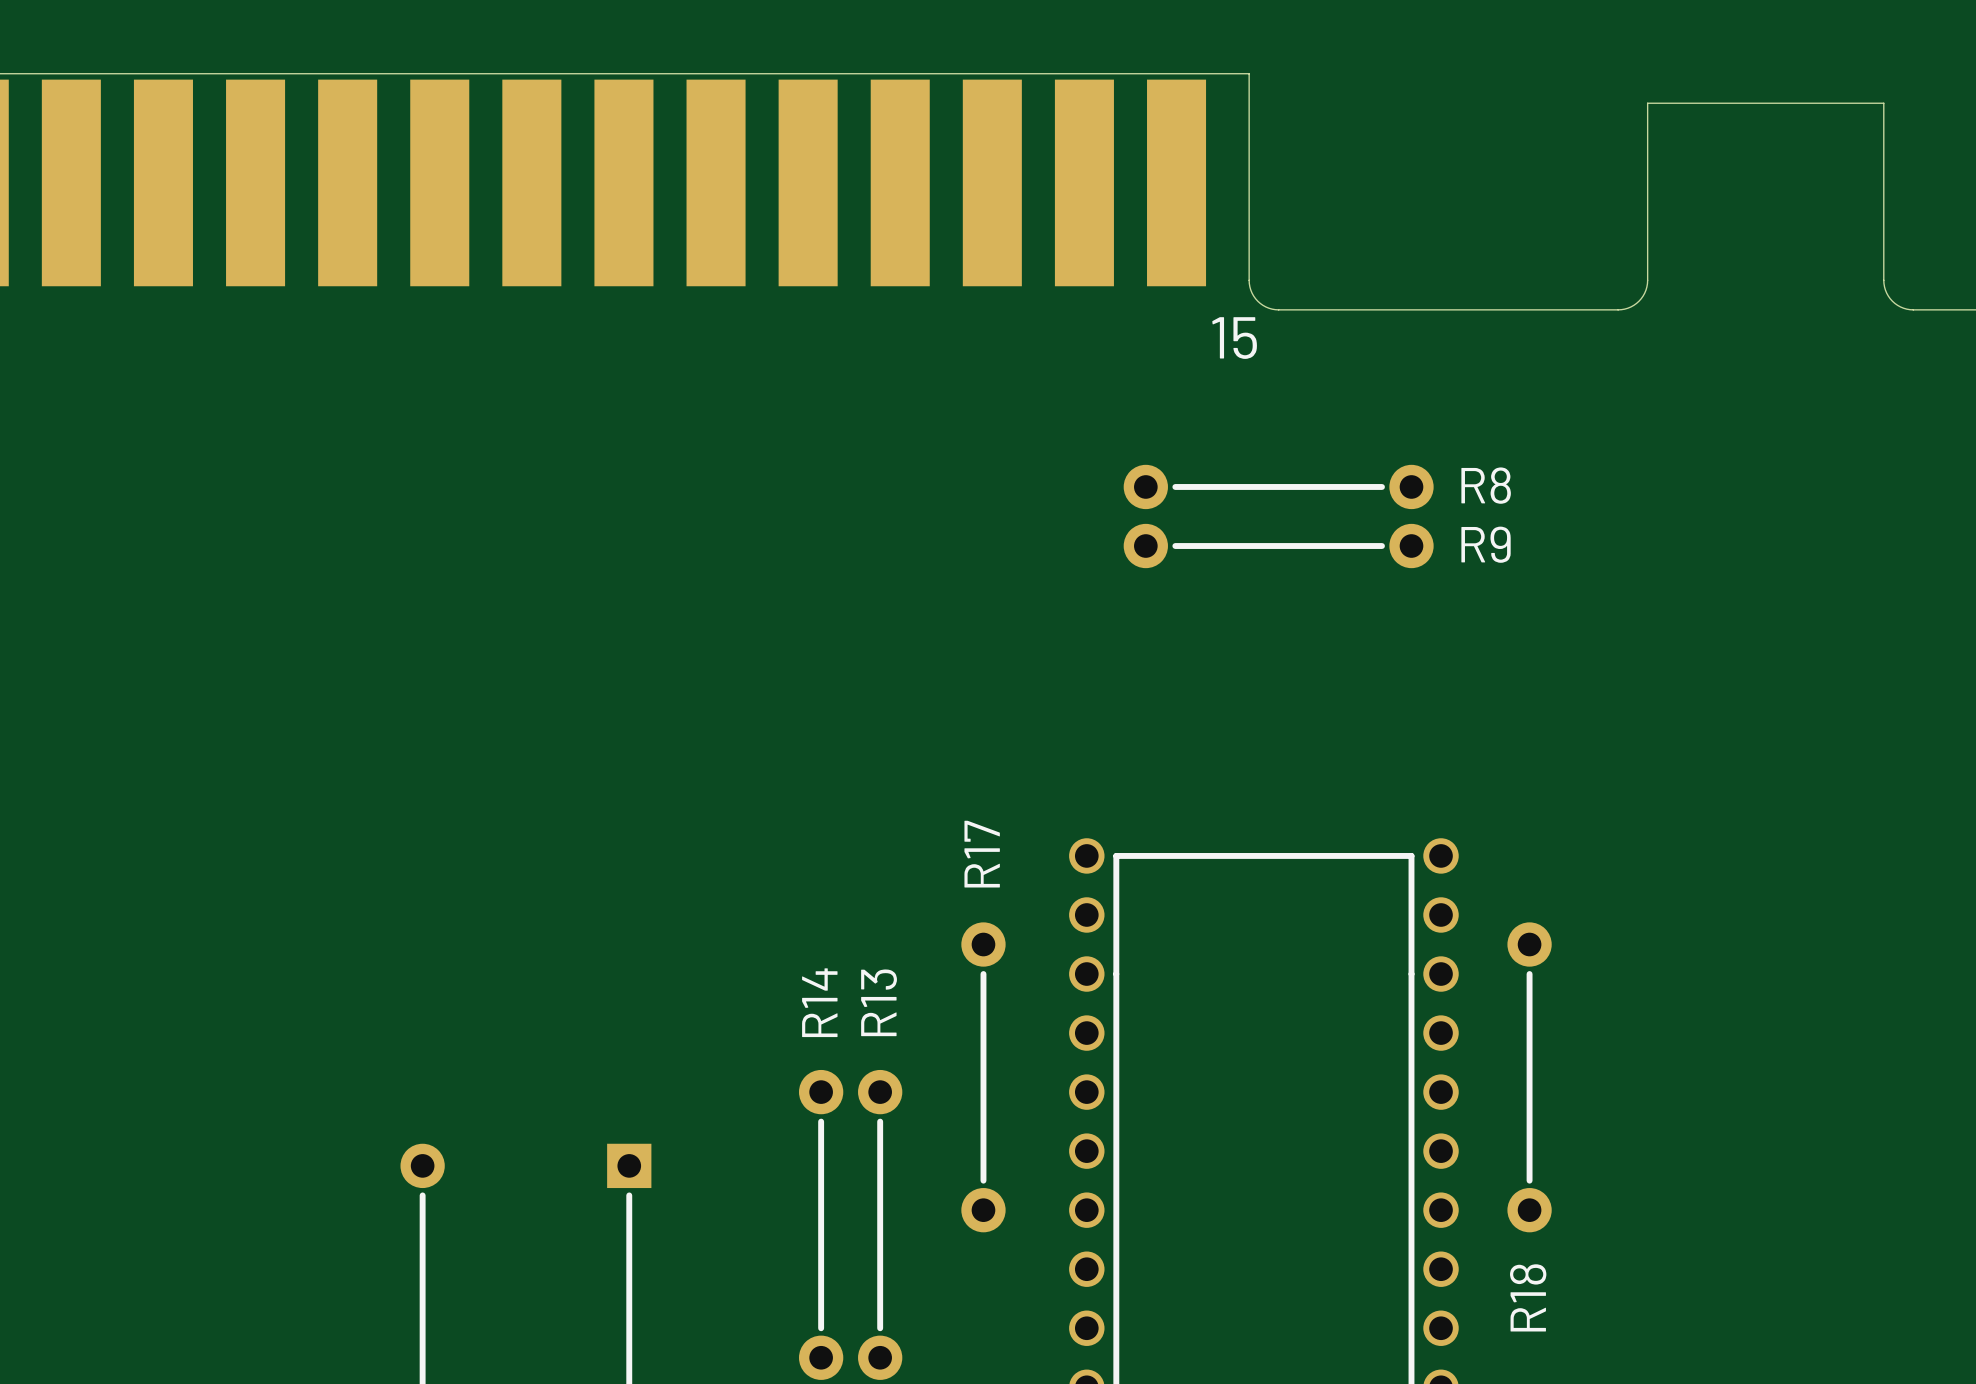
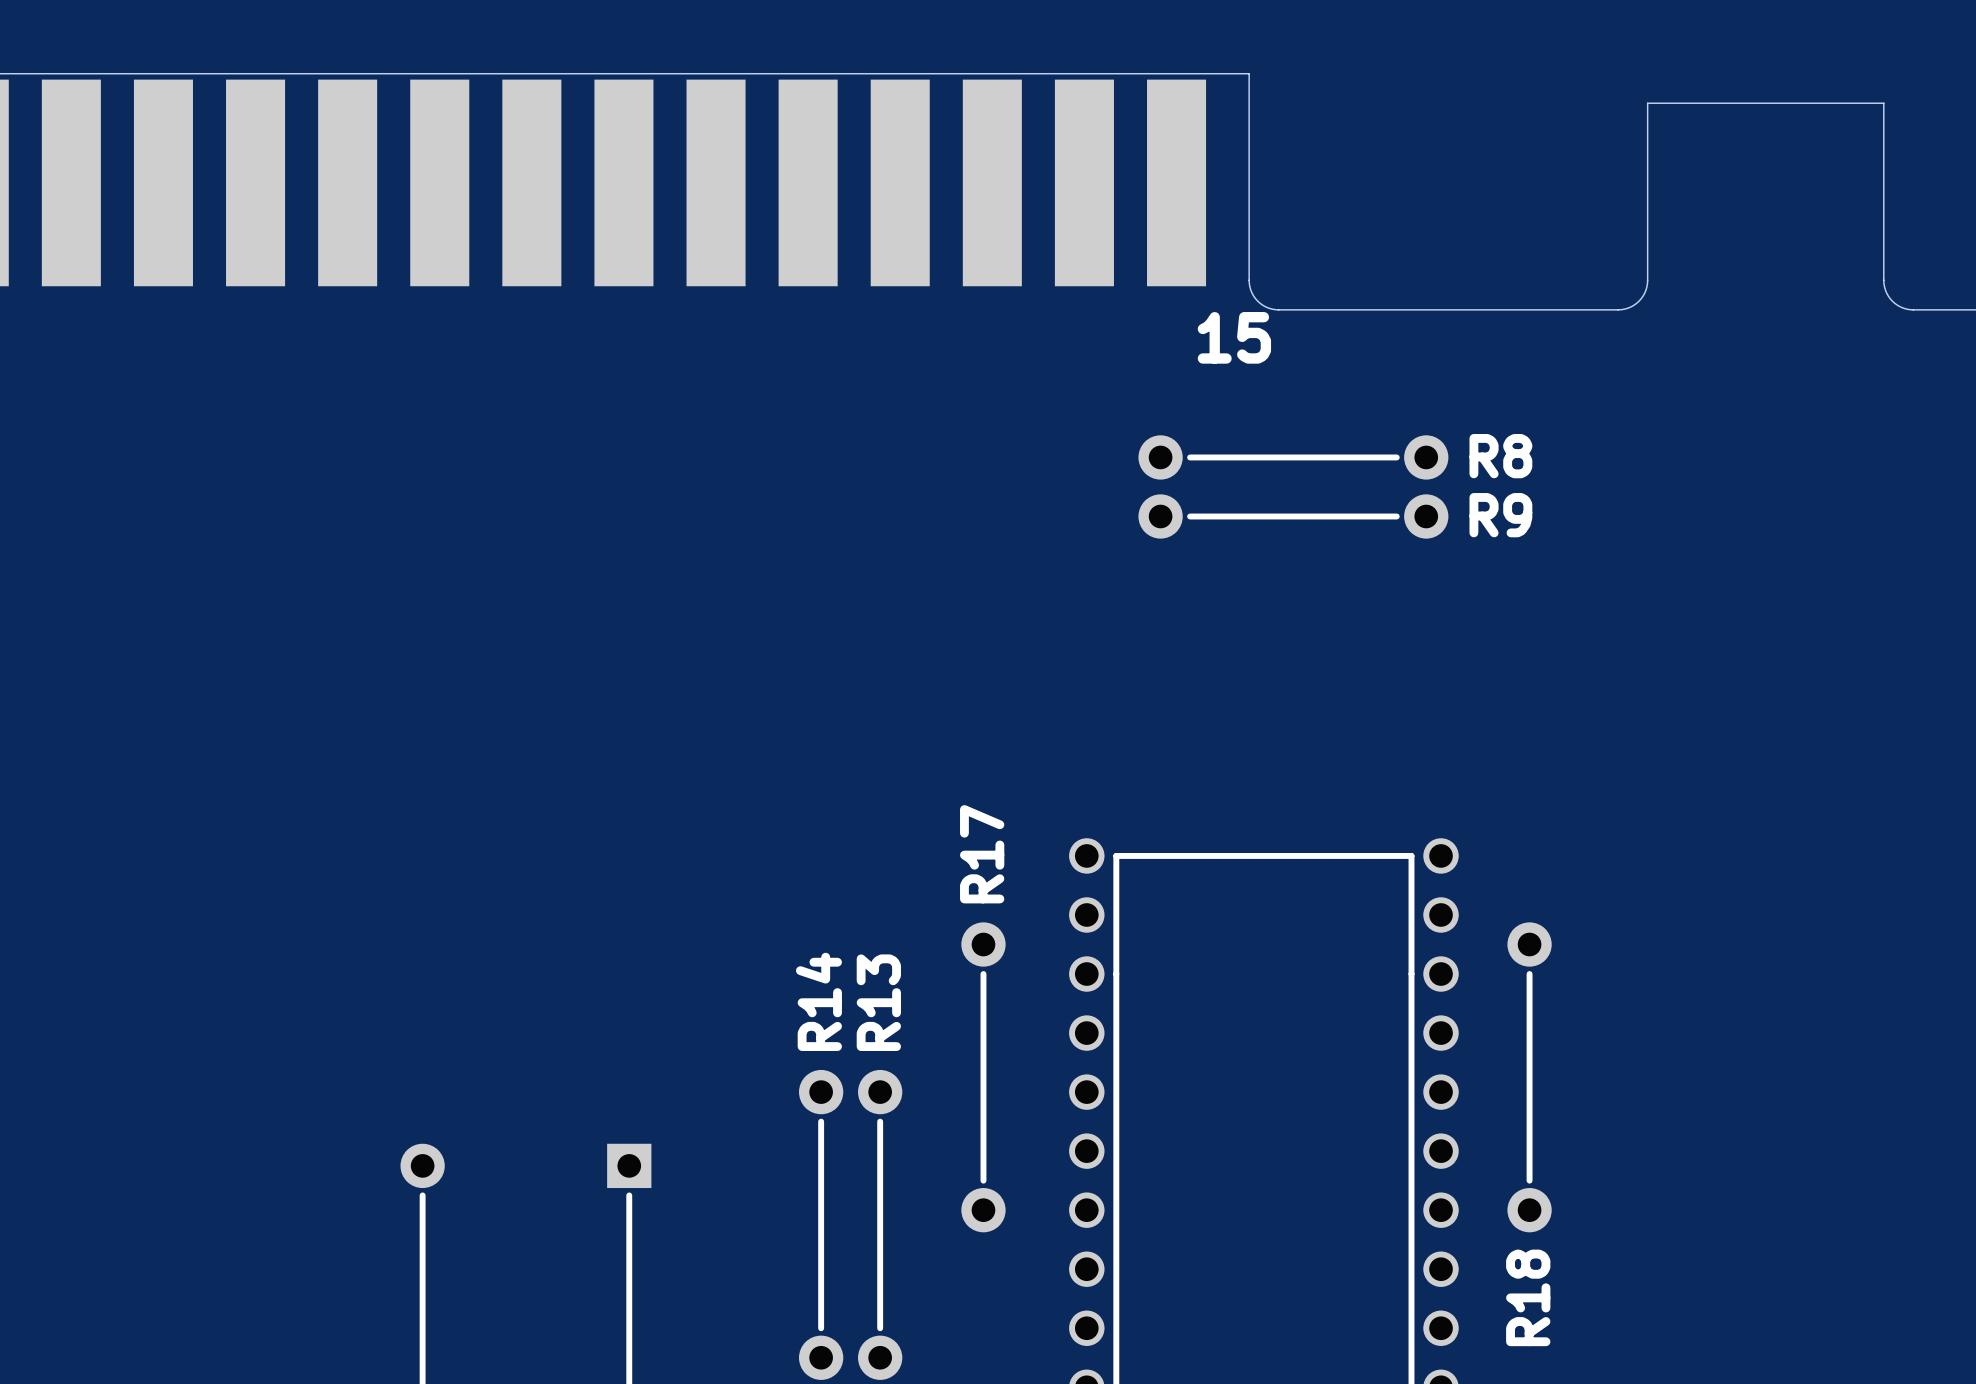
R8 position: (1278, 486) -> (1293, 457)
R9 position: (1278, 546) -> (1293, 516)

